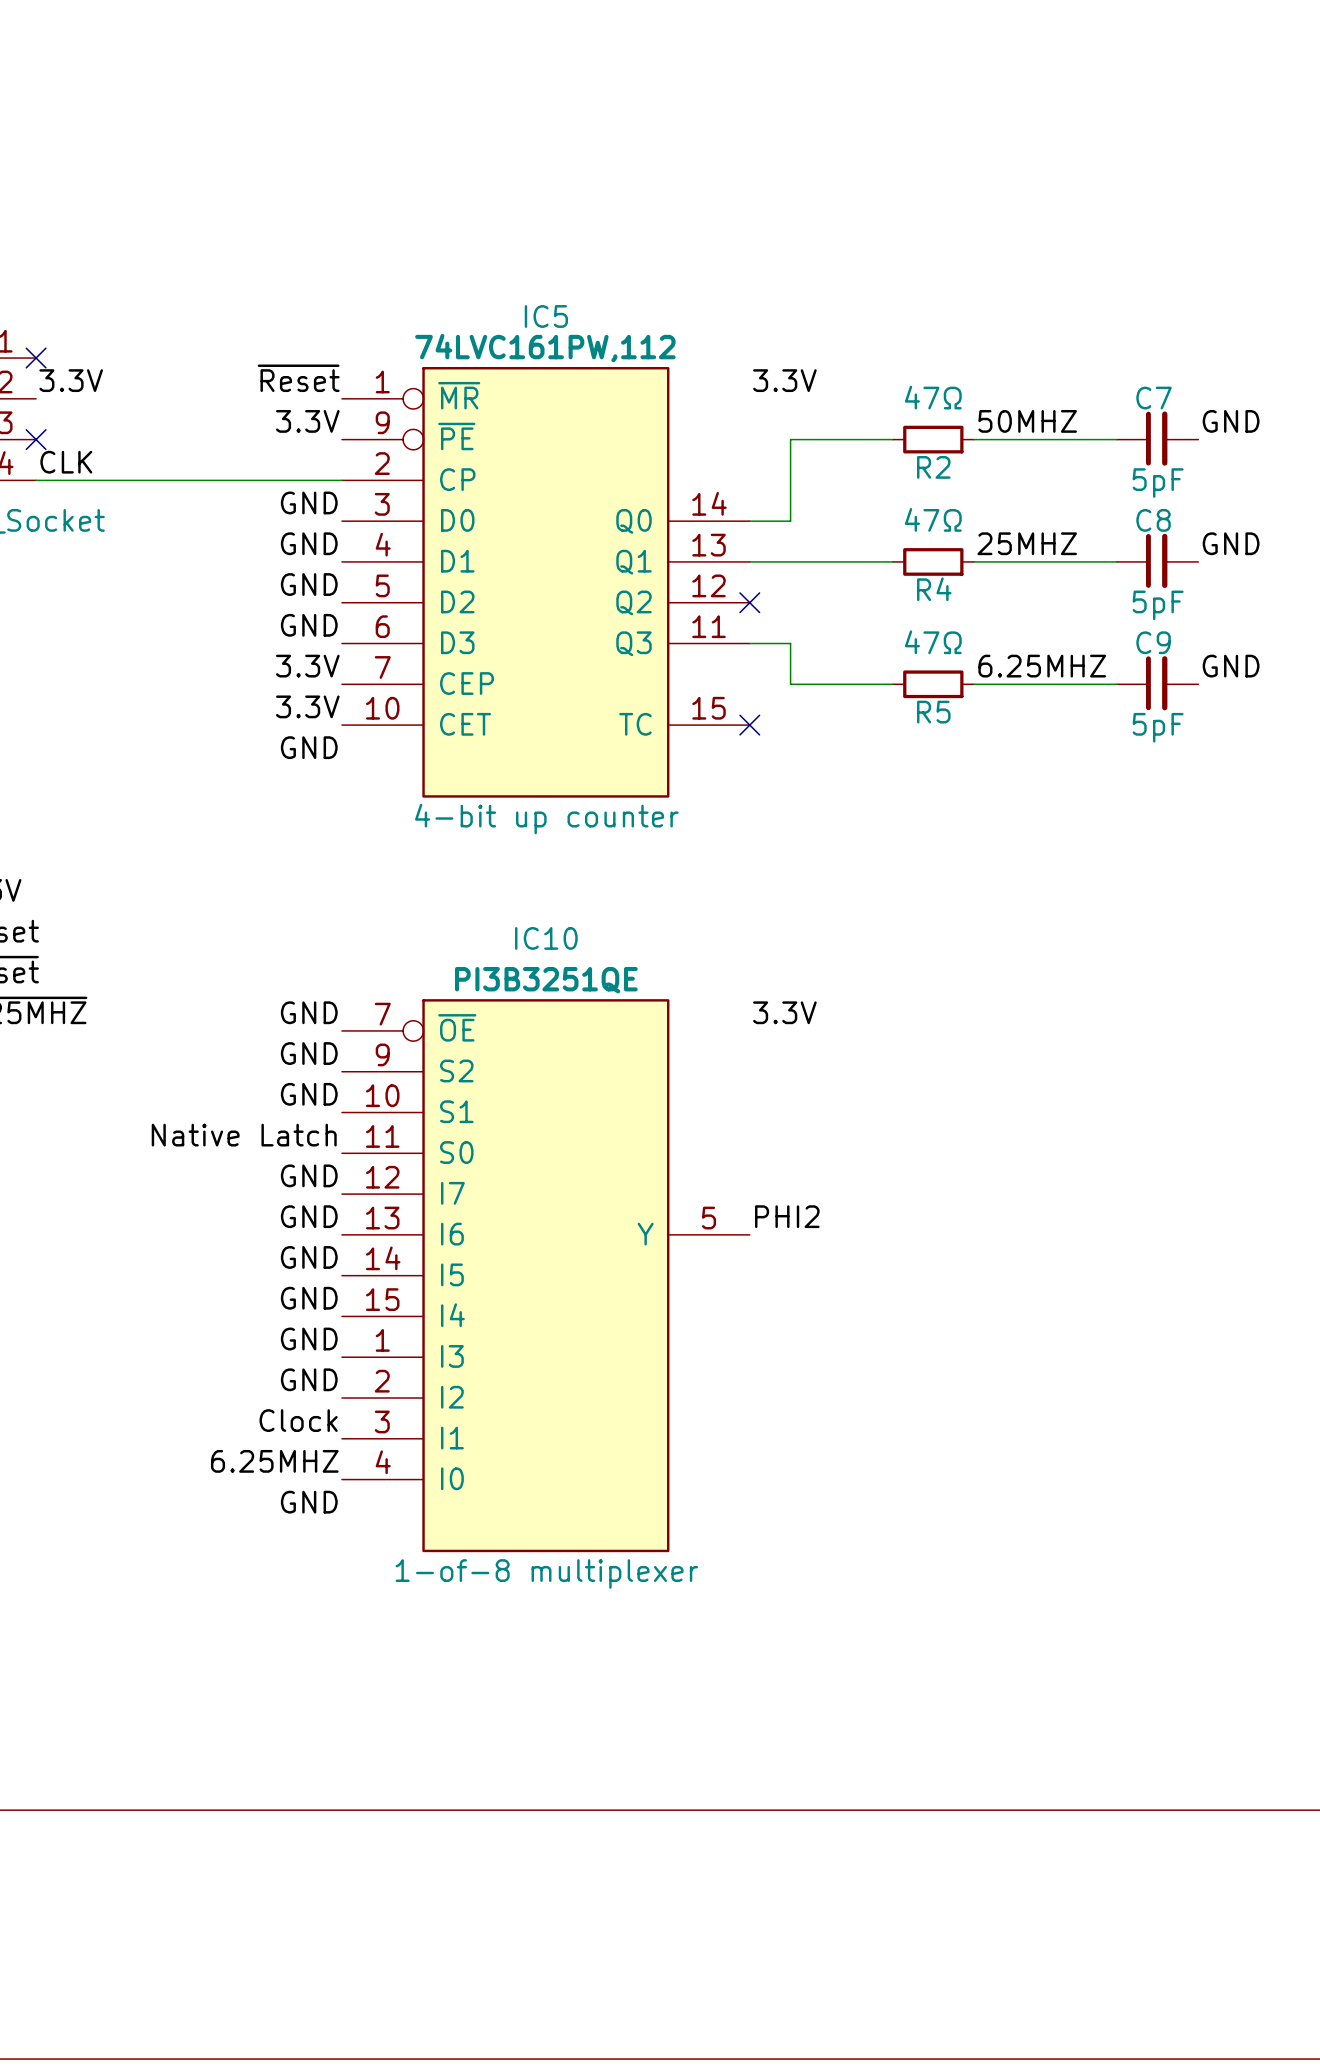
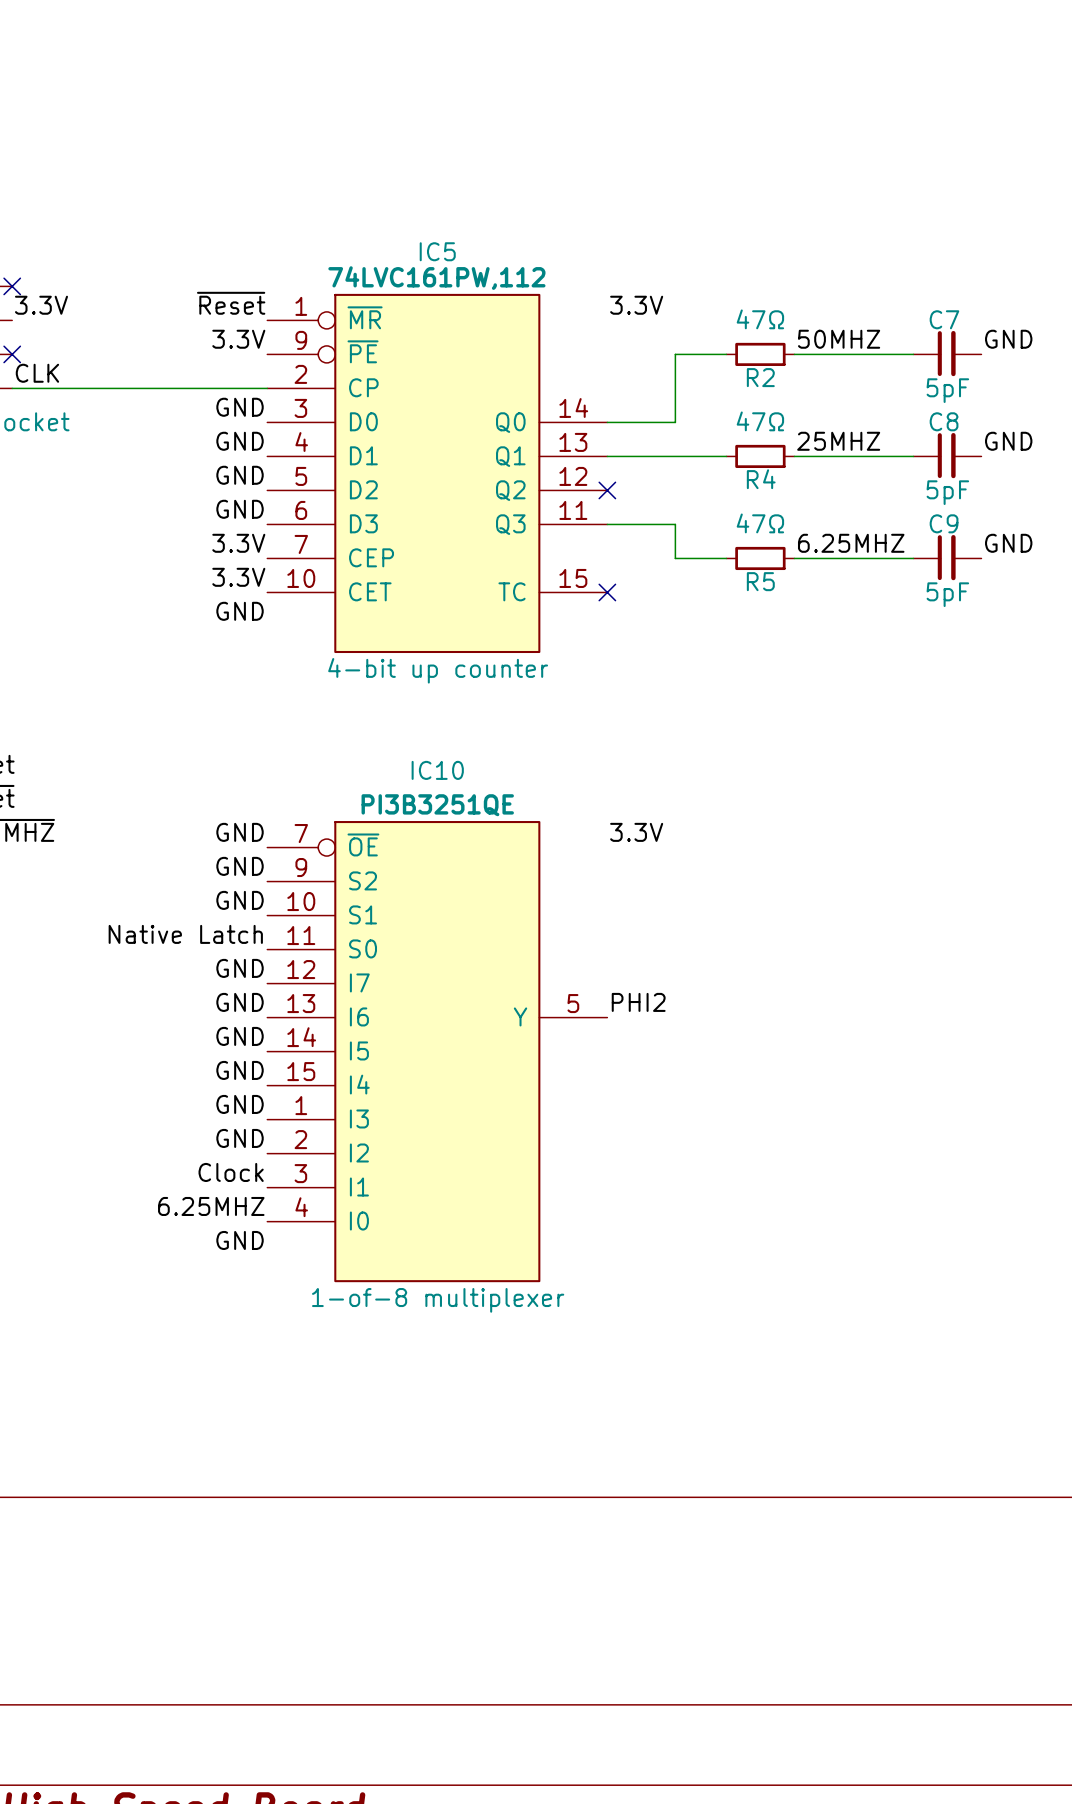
wire: (831, 439) (790, 439) (790, 521) -> (675, 354) (675, 422) (641, 422)
wire: (790, 643) (790, 684) (831, 684) -> (641, 524) (675, 524) (675, 558)

